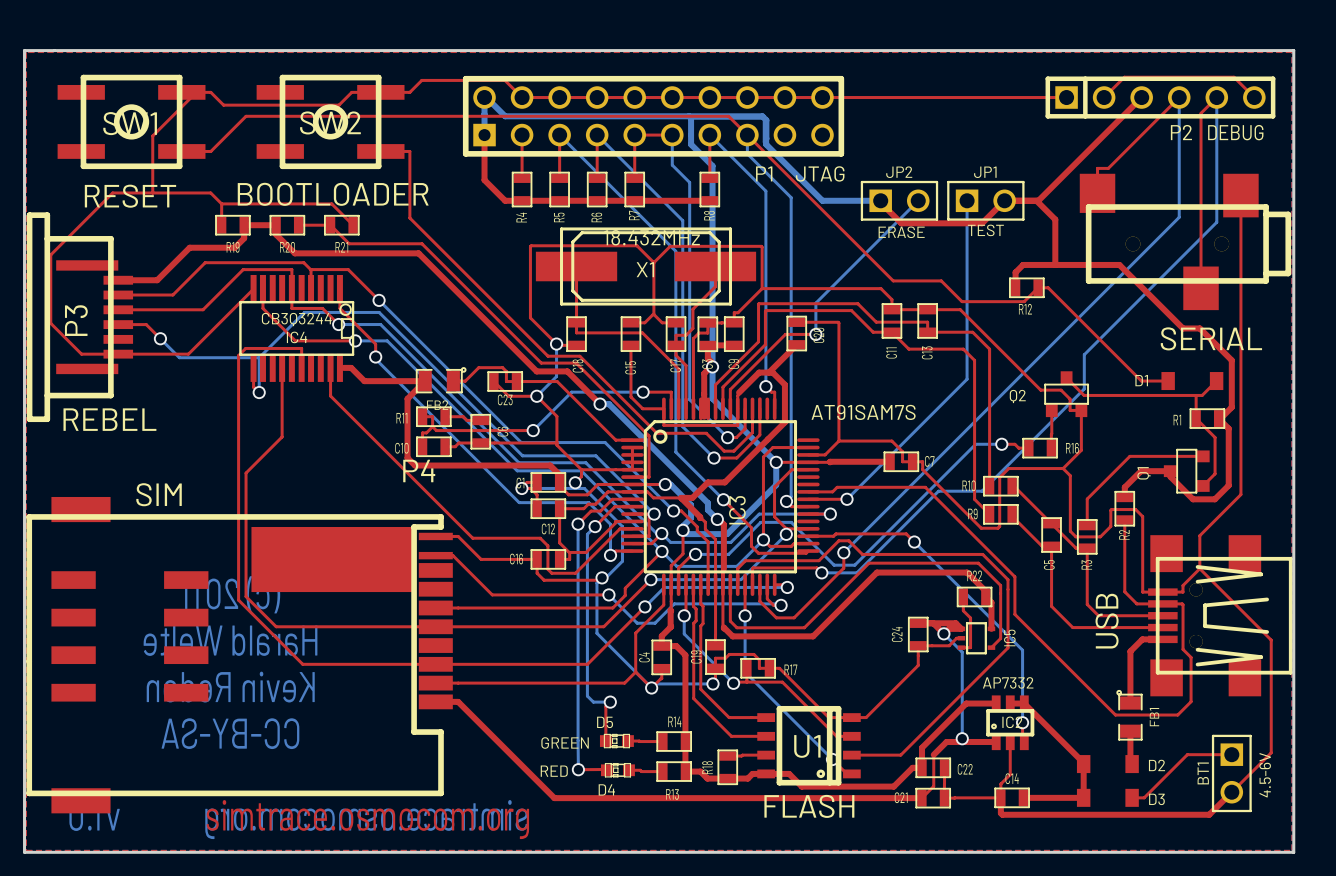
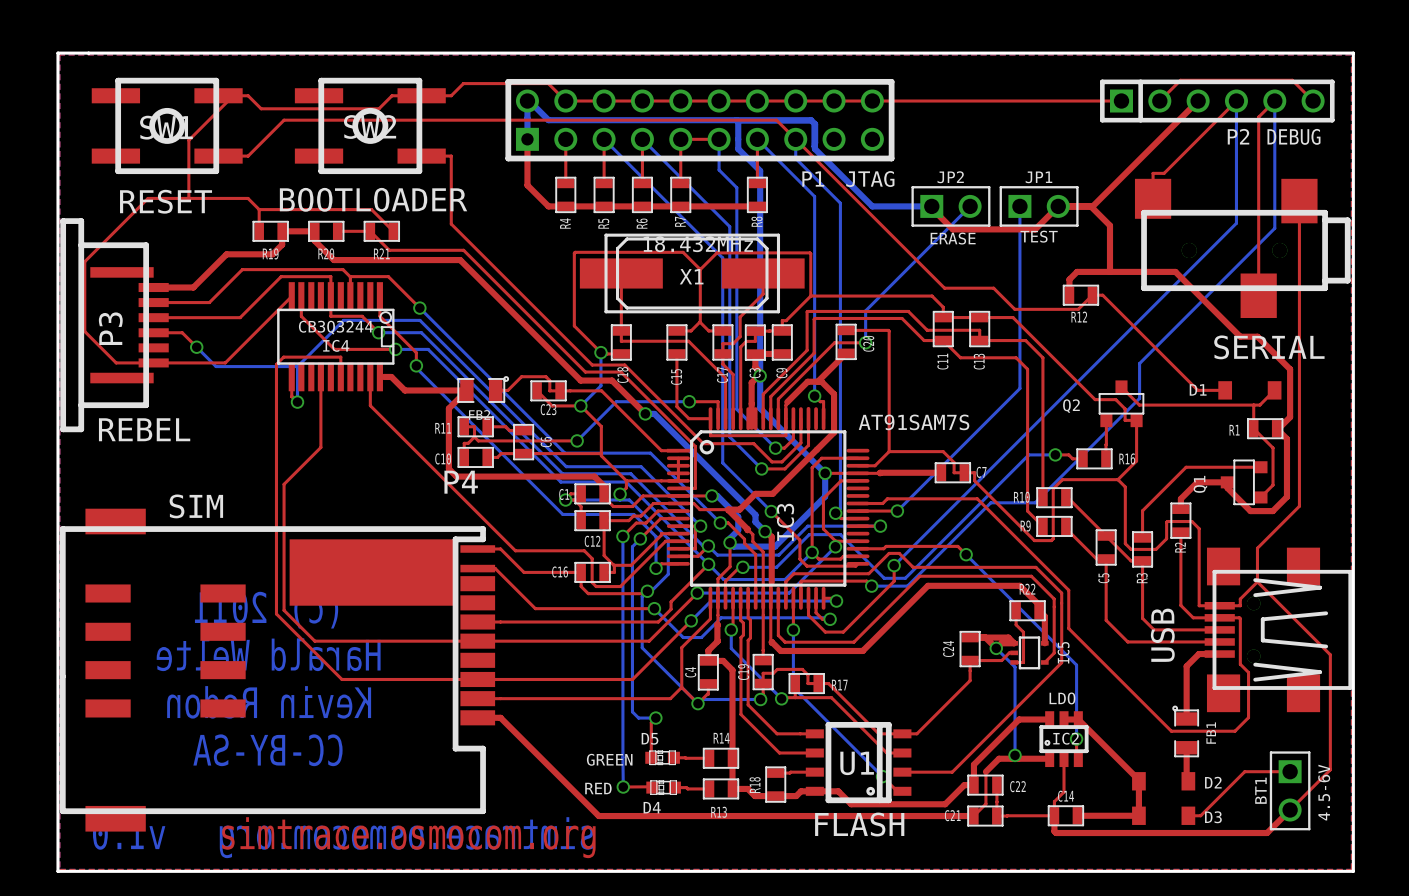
IC2 value: AP7332 (1008, 682) -> LDO (1062, 698)

